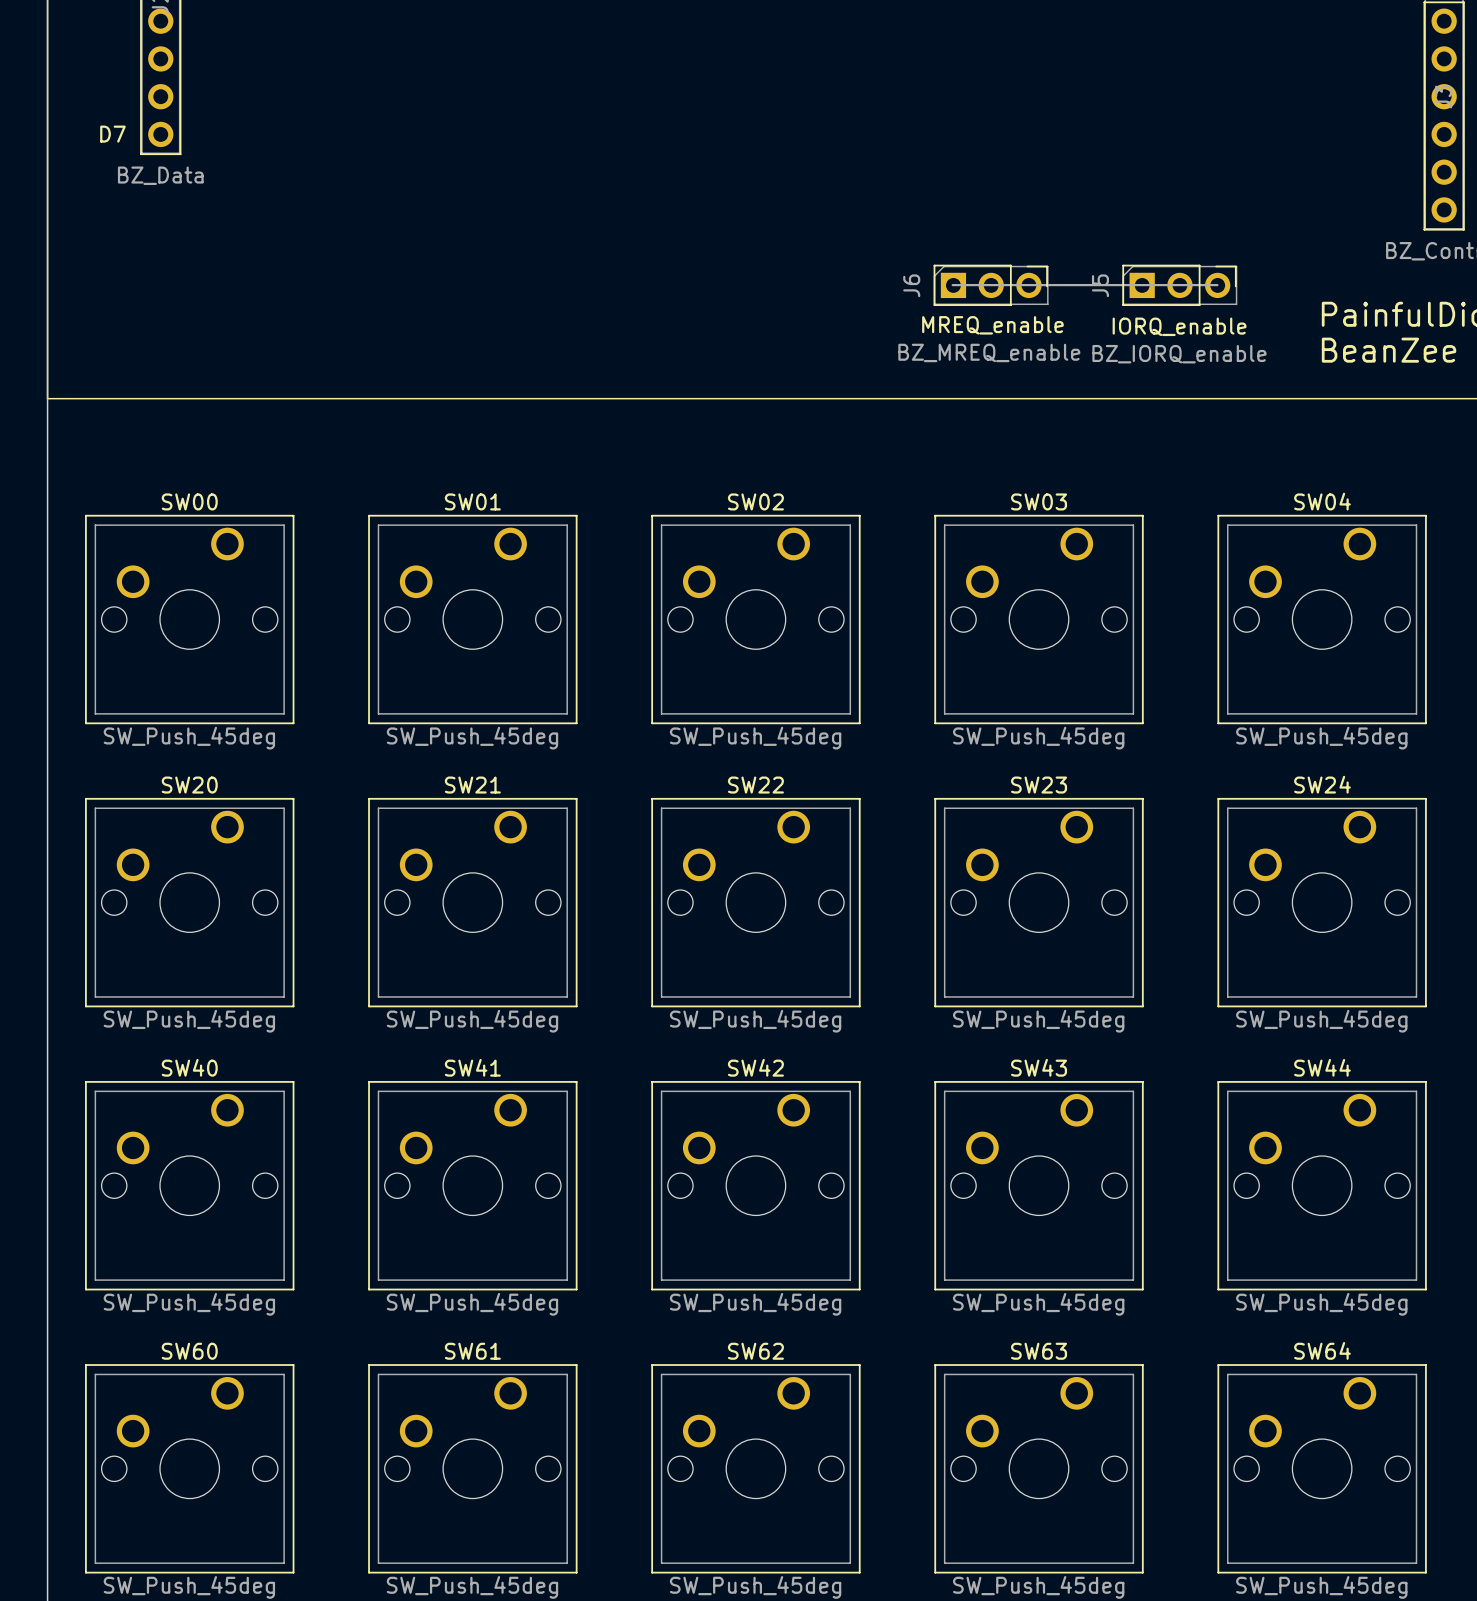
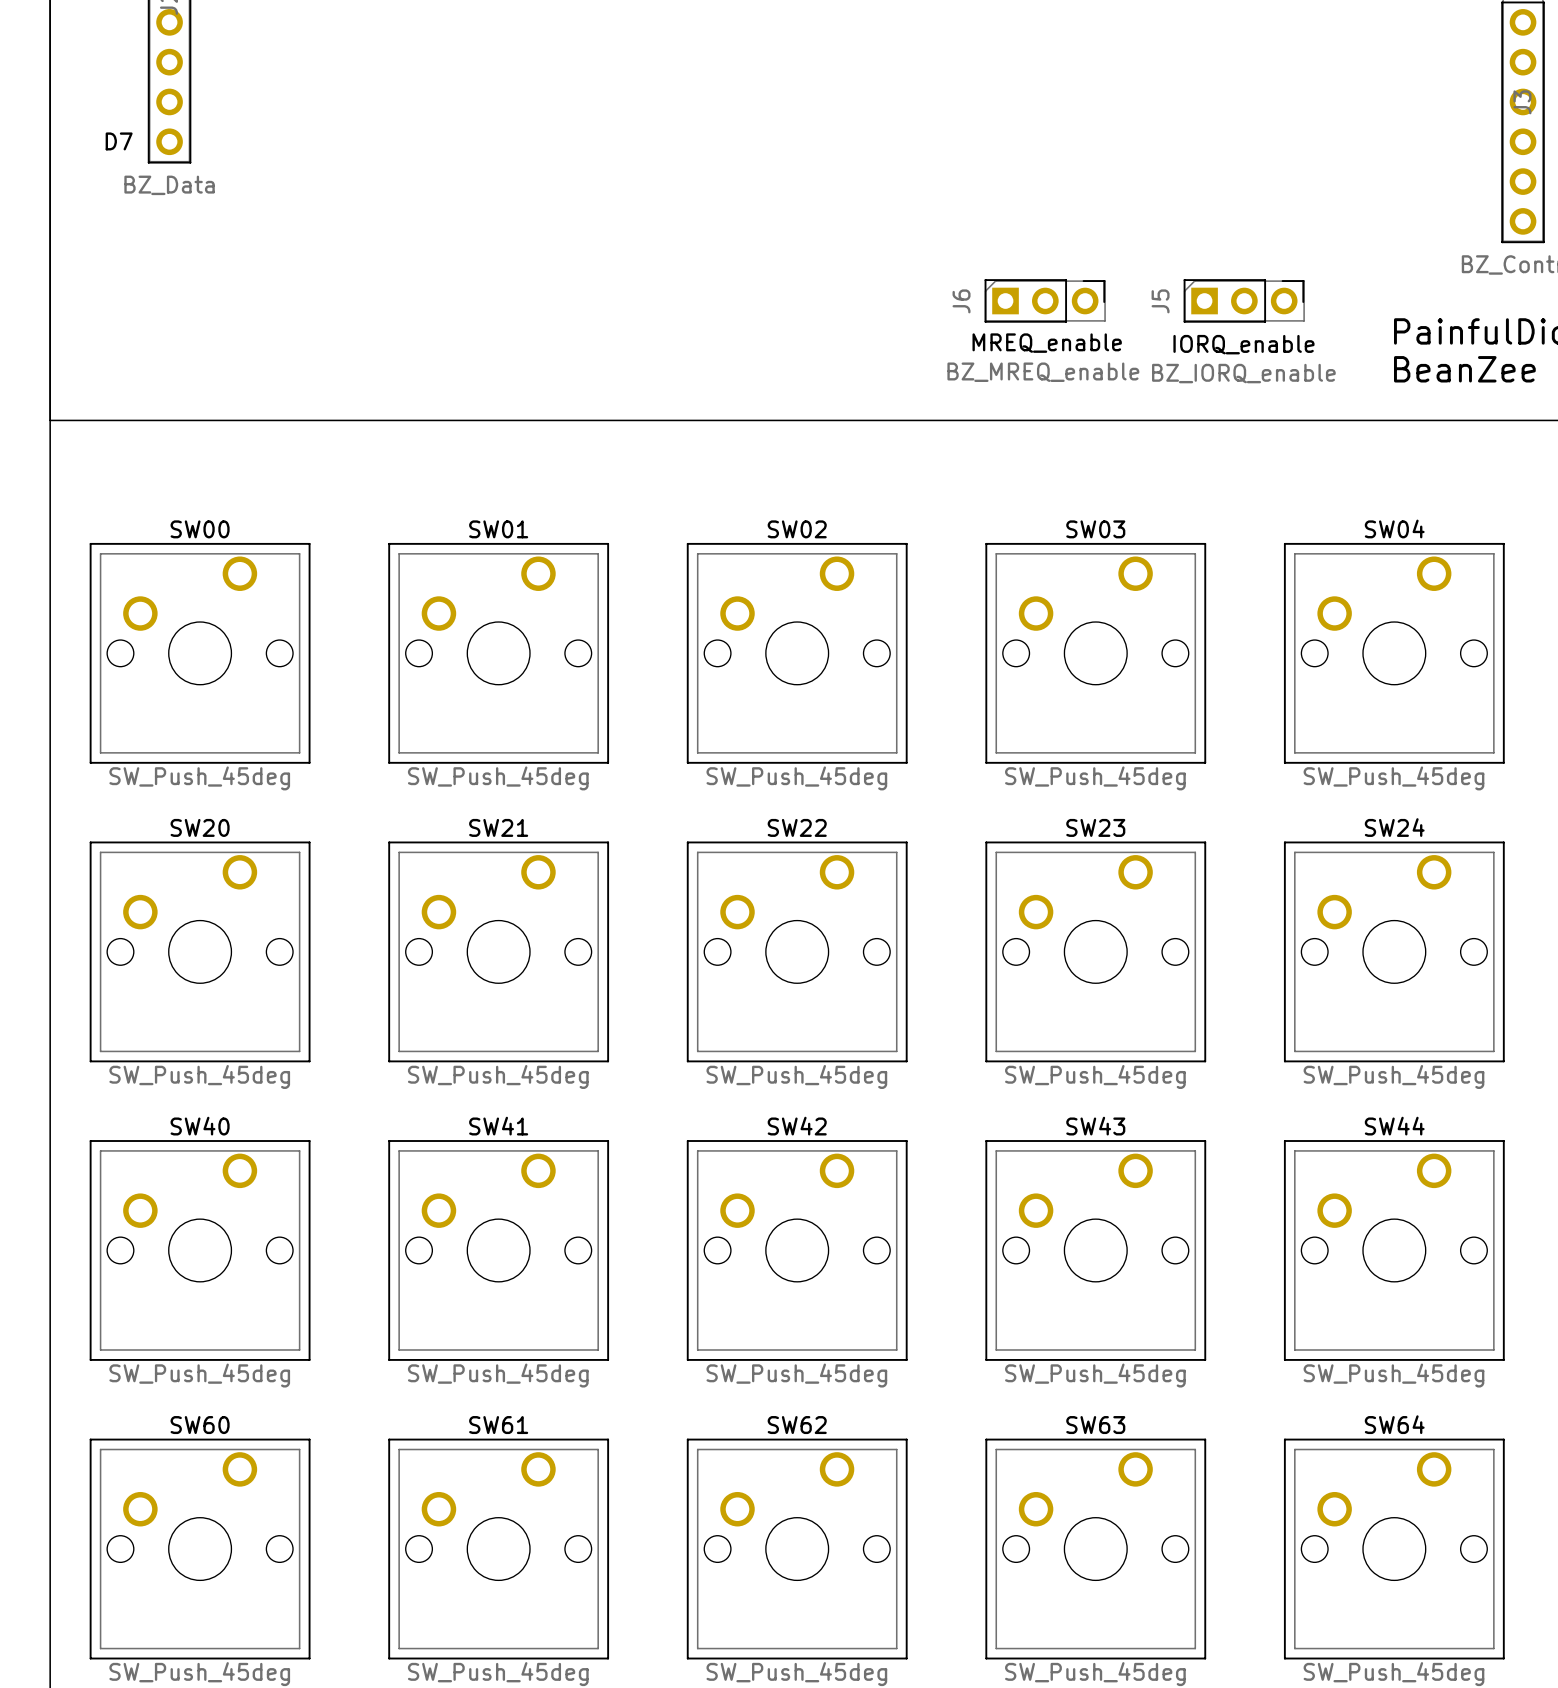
line: (952, 285) (1217, 285) -> none

